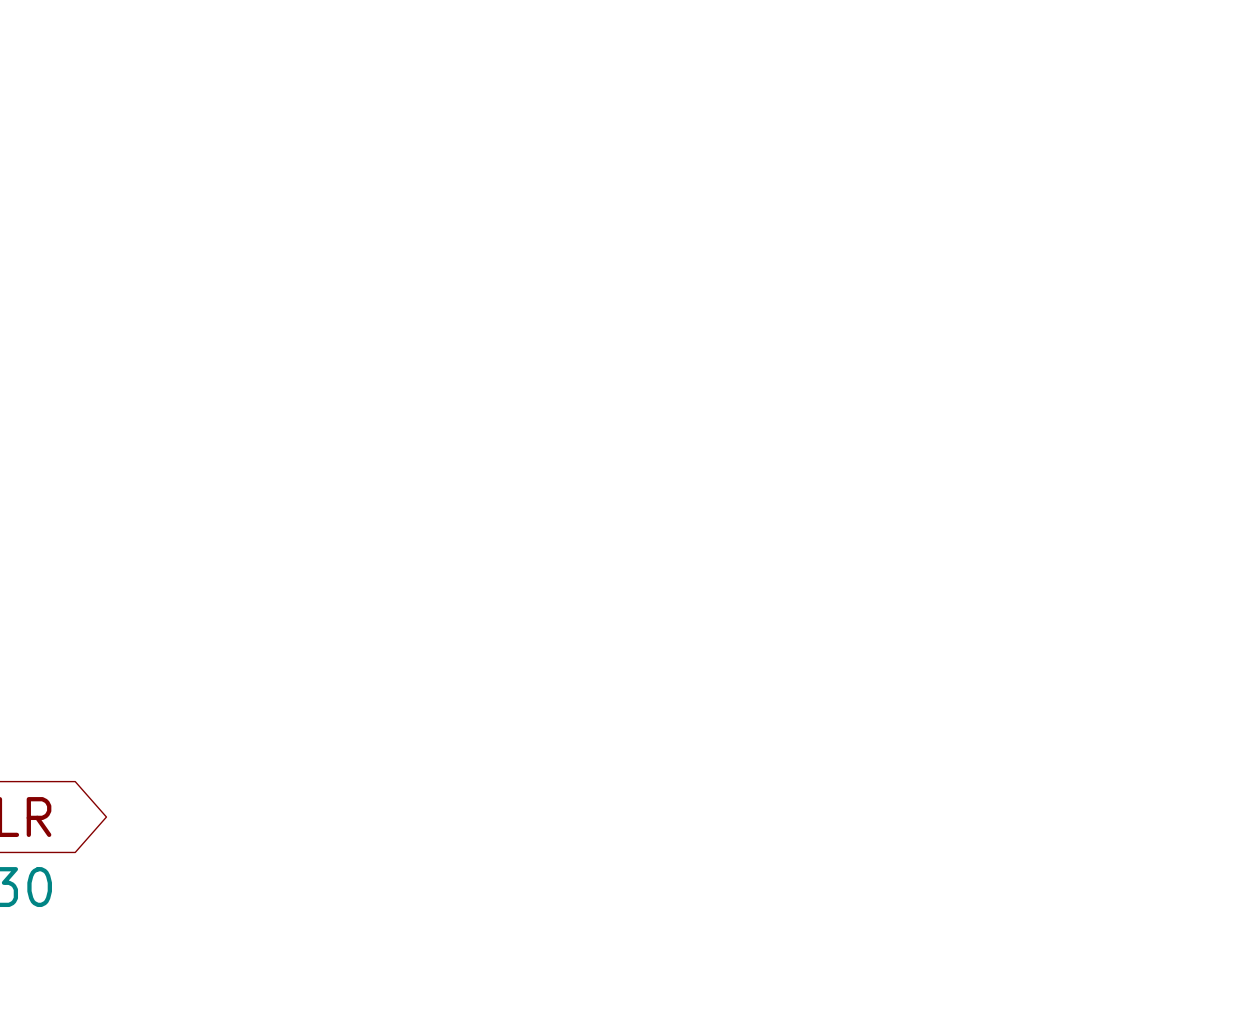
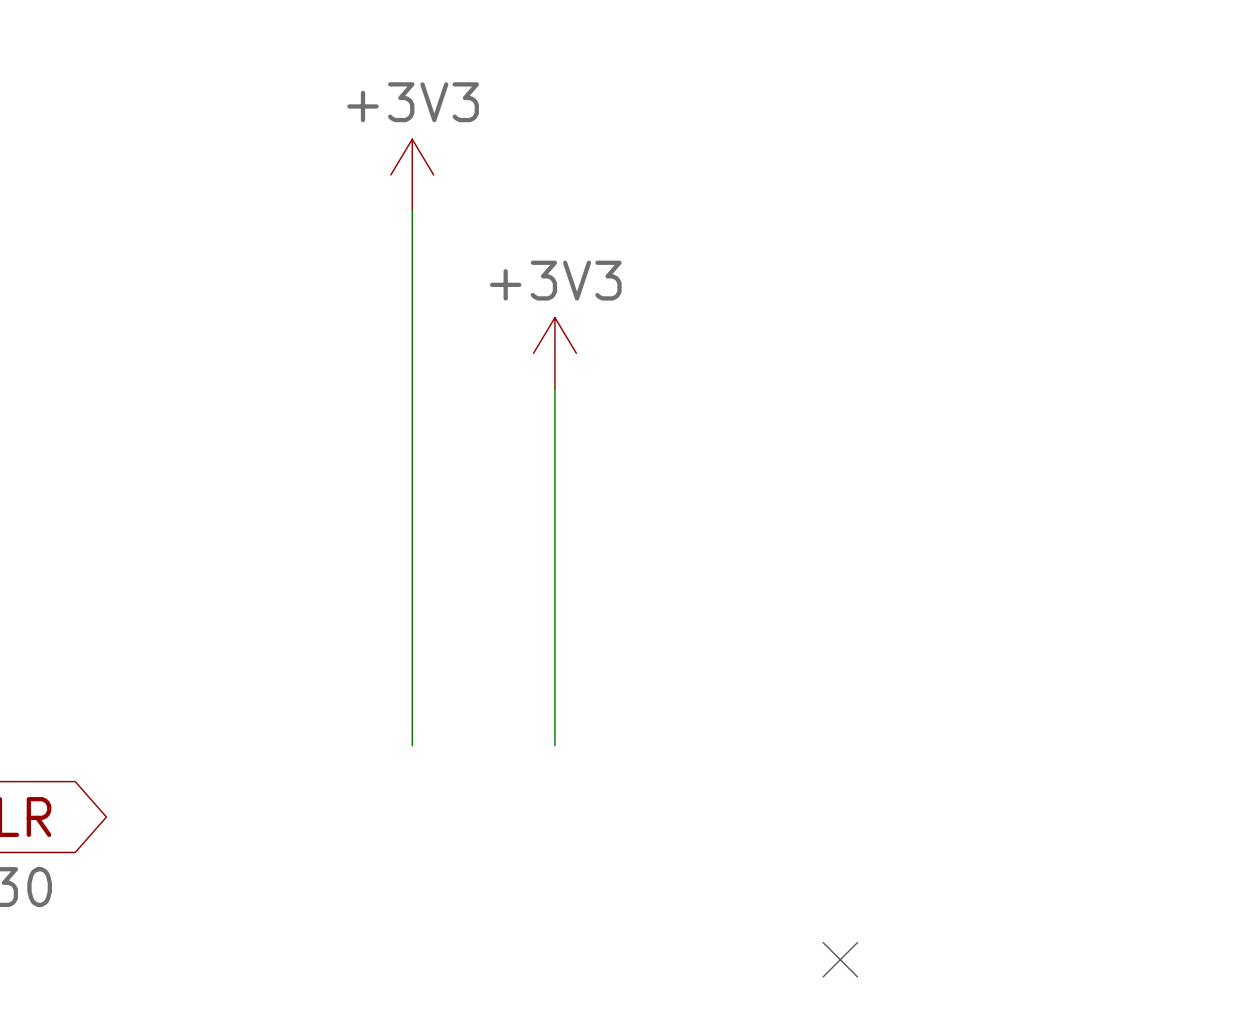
power symbol: none -> +3V3 (412, 174)
wire: none -> (412, 210) (412, 745)
power symbol: none -> +3V3 (554, 353)
wire: none -> (554, 388) (554, 745)
no-connect mark: none -> (840, 959)

